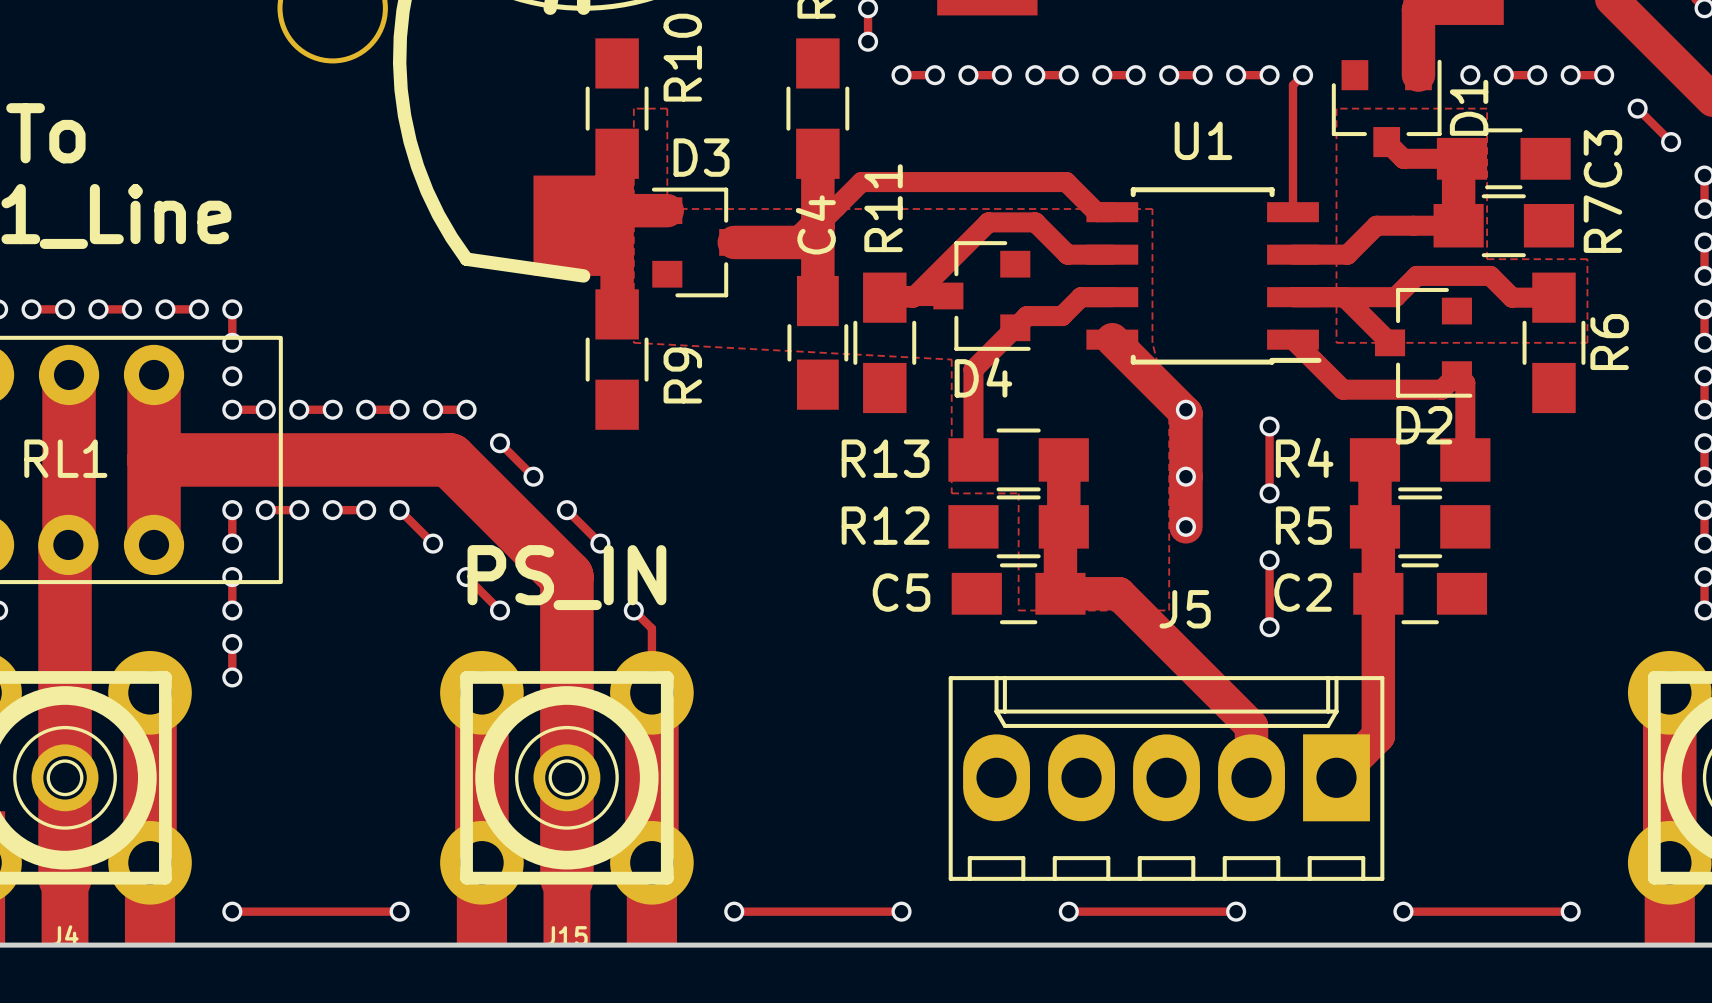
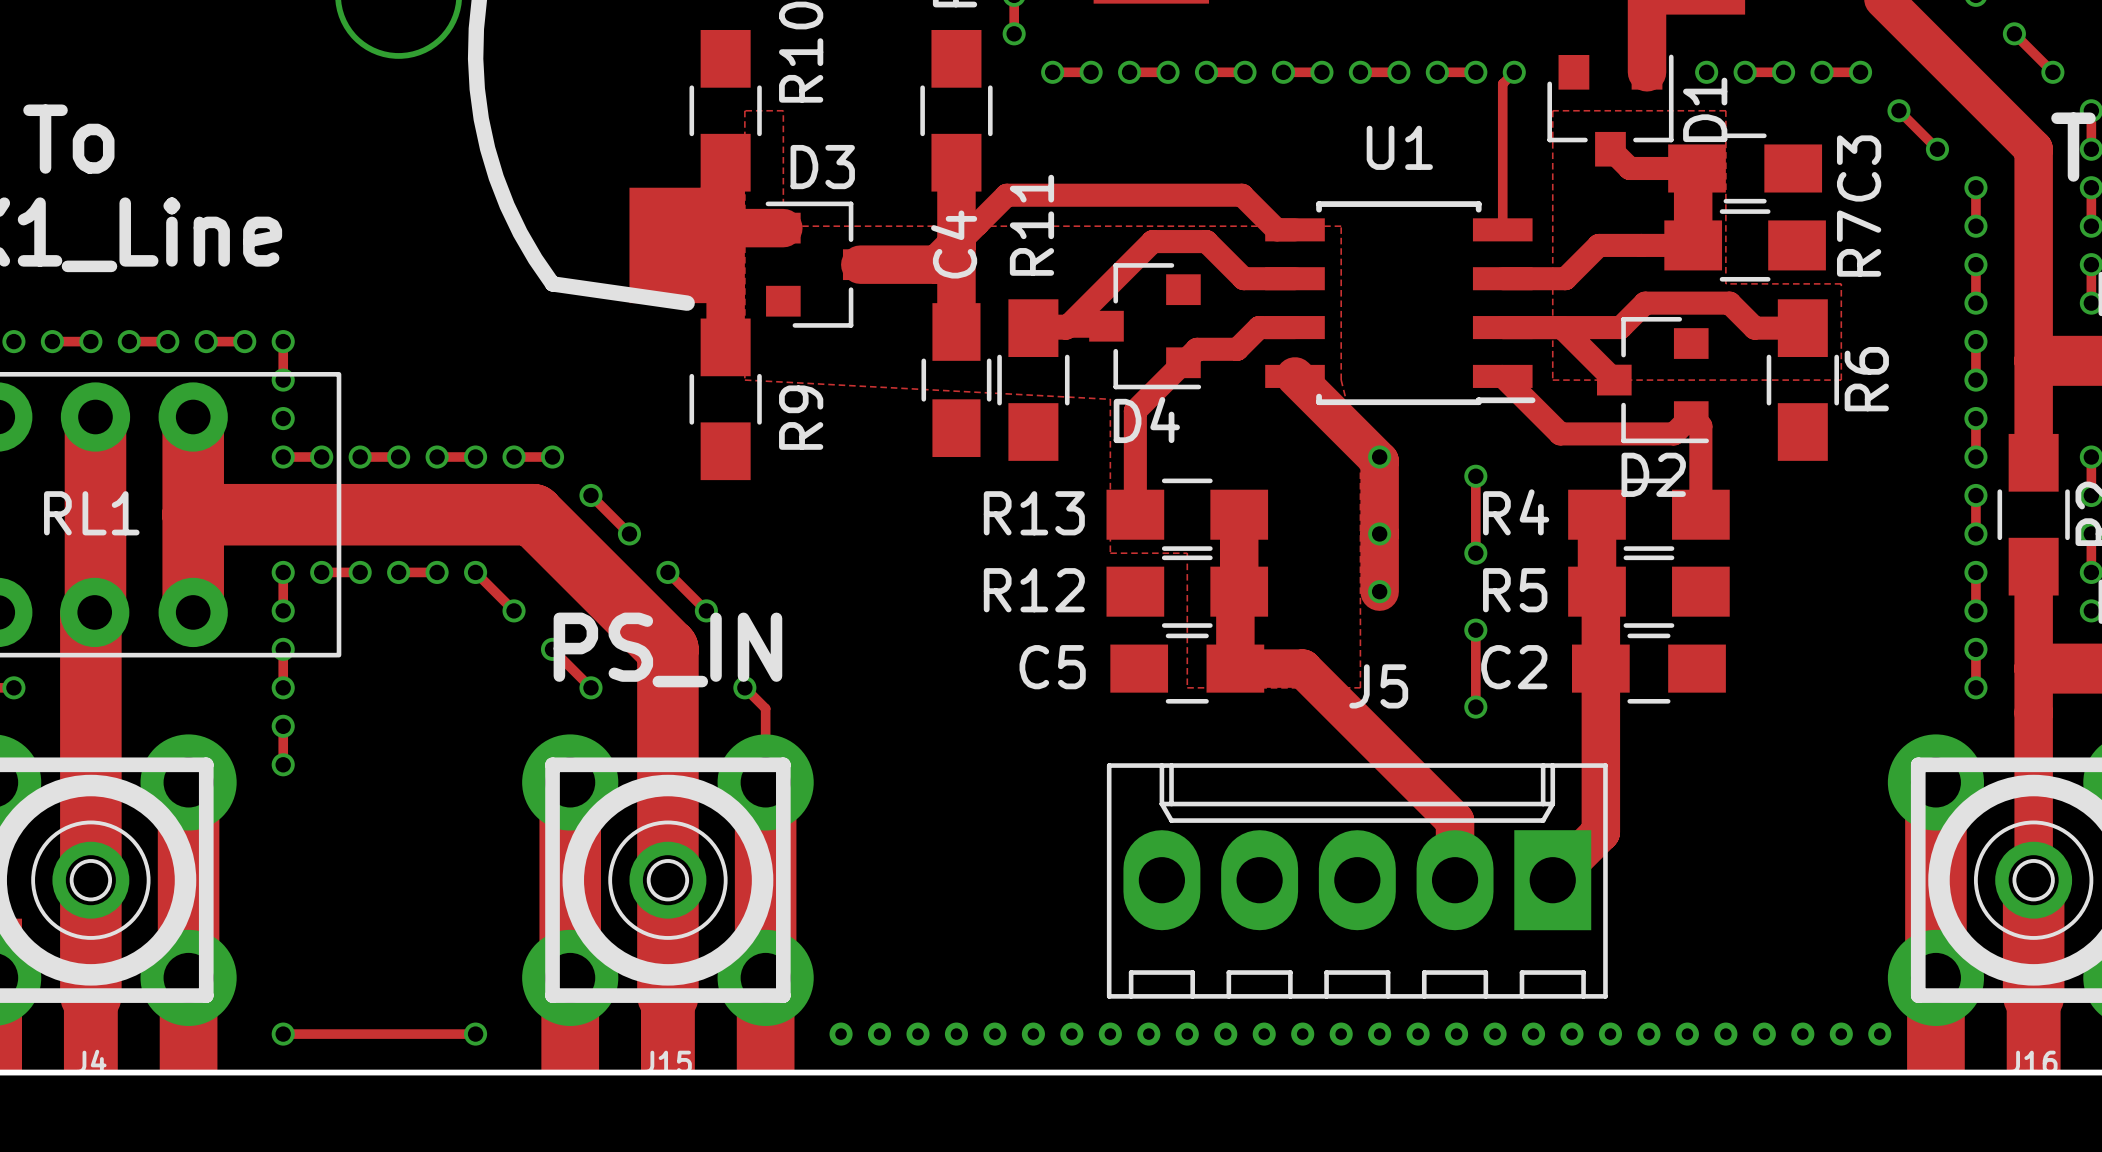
part: none -> (841, 1034)
track: (734, 911) (901, 911) -> none
via: (734, 911) -> none
part: none -> (879, 1034)
part: none -> (917, 1034)
part: none -> (956, 1034)
part: none -> (994, 1034)
part: none -> (1033, 1034)
via: (901, 911) -> none
part: none -> (1071, 1034)
part: none -> (1110, 1034)
part: none -> (1148, 1034)
part: none -> (1187, 1034)
part: none -> (1225, 1034)
track: (1068, 911) (1236, 911) -> none
via: (1068, 911) -> none
part: none -> (1264, 1034)
part: none -> (1302, 1034)
part: none -> (1341, 1034)
part: none -> (1379, 1034)
part: none -> (1418, 1034)
via: (1236, 911) -> none
part: none -> (1456, 1034)
part: none -> (1495, 1034)
part: none -> (1533, 1034)
part: none -> (1572, 1034)
part: none -> (1610, 1034)
track: (1403, 911) (1570, 911) -> none
via: (1403, 911) -> none
part: none -> (1648, 1034)
part: none -> (1687, 1034)
part: none -> (1725, 1034)
part: none -> (1764, 1034)
part: none -> (1802, 1034)
via: (1570, 911) -> none
part: none -> (1841, 1034)
part: none -> (1879, 1034)

